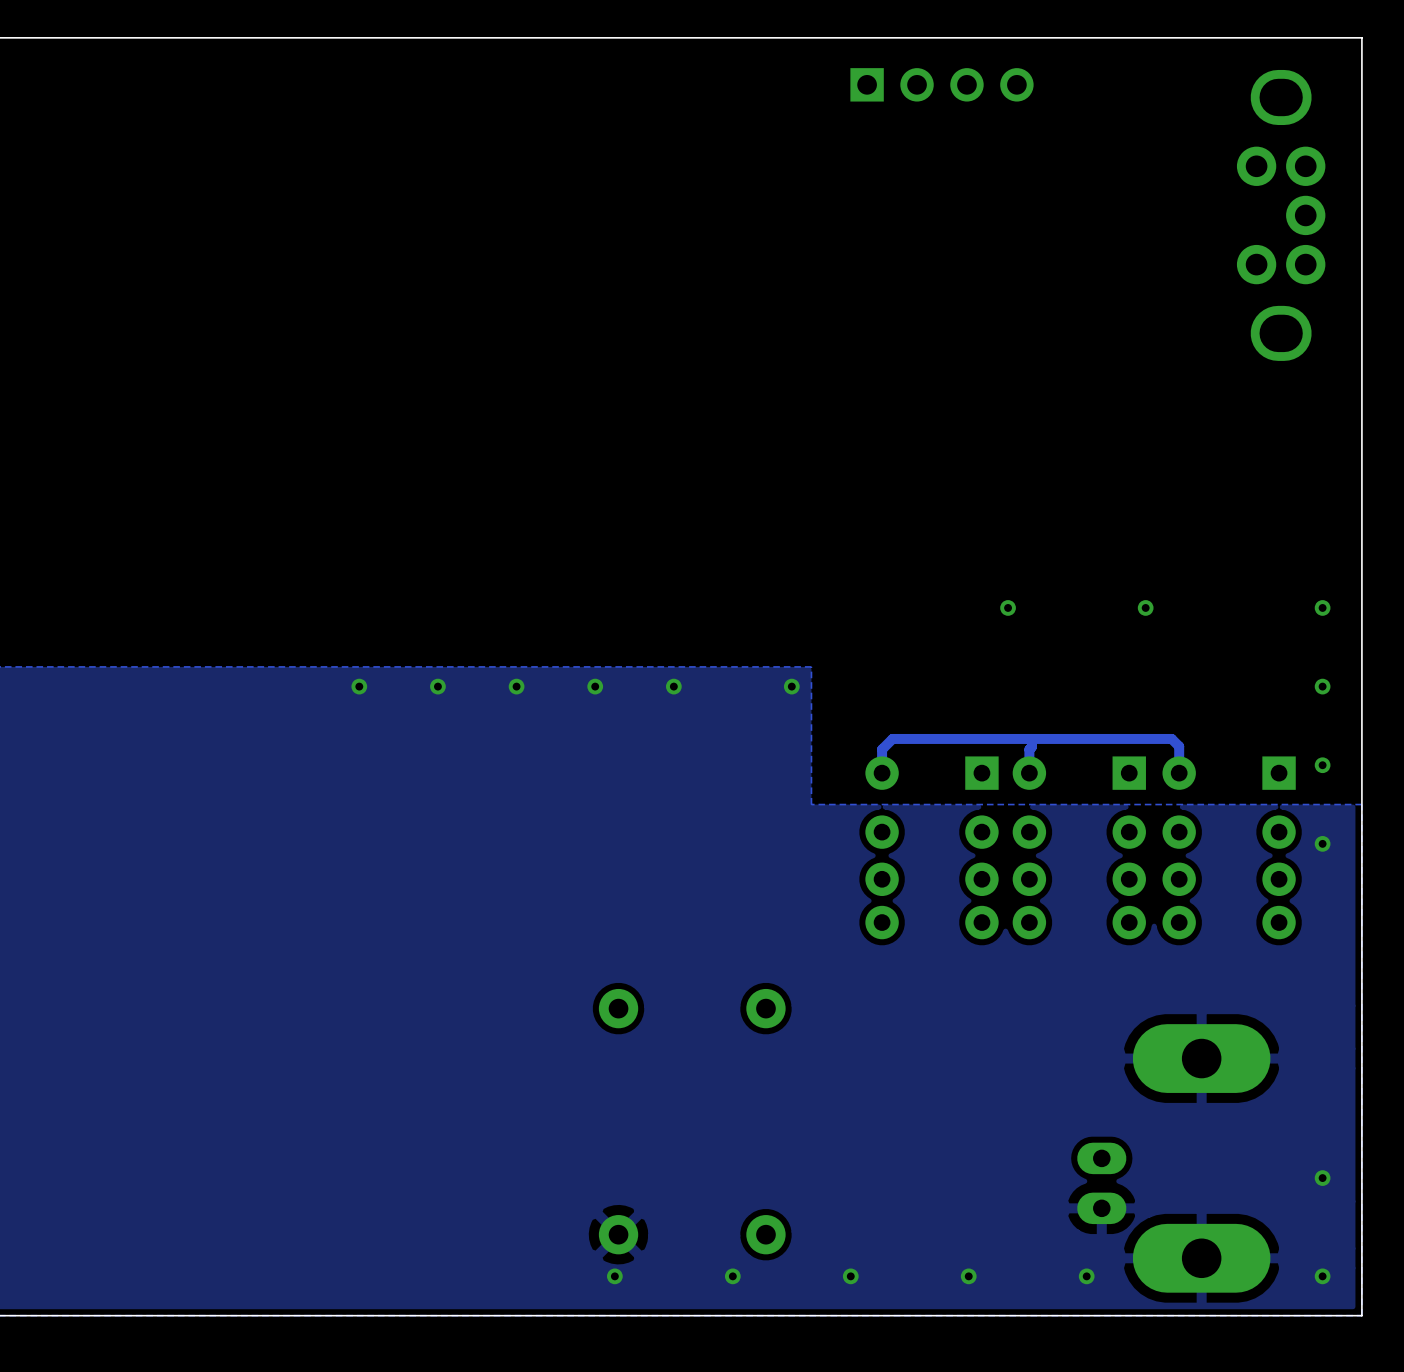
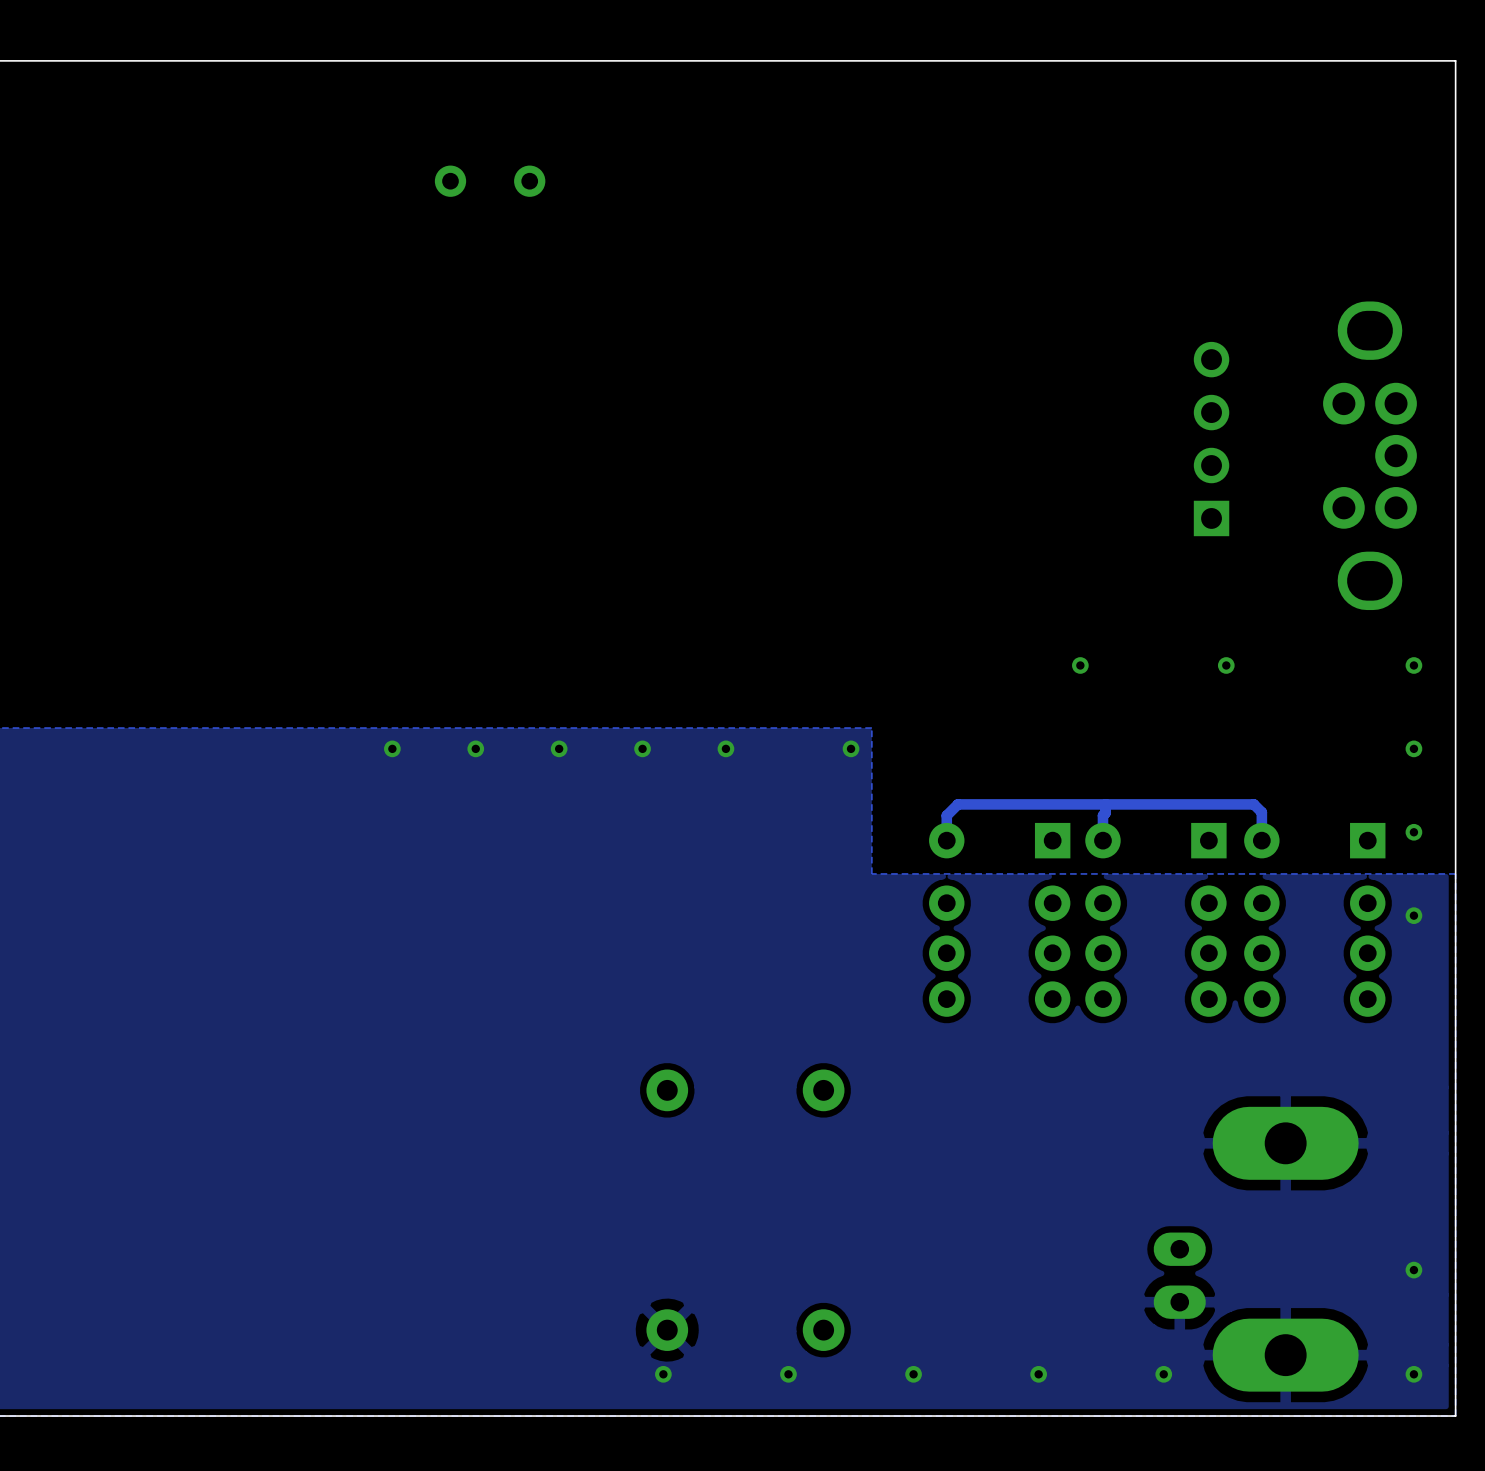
part rotation: 0° (942, 84) -> 90° counterclockwise (1211, 439)
part position: (942, 84) -> (1211, 439)
part: none -> (490, 181)
part position: (1281, 215) -> (1369, 455)

